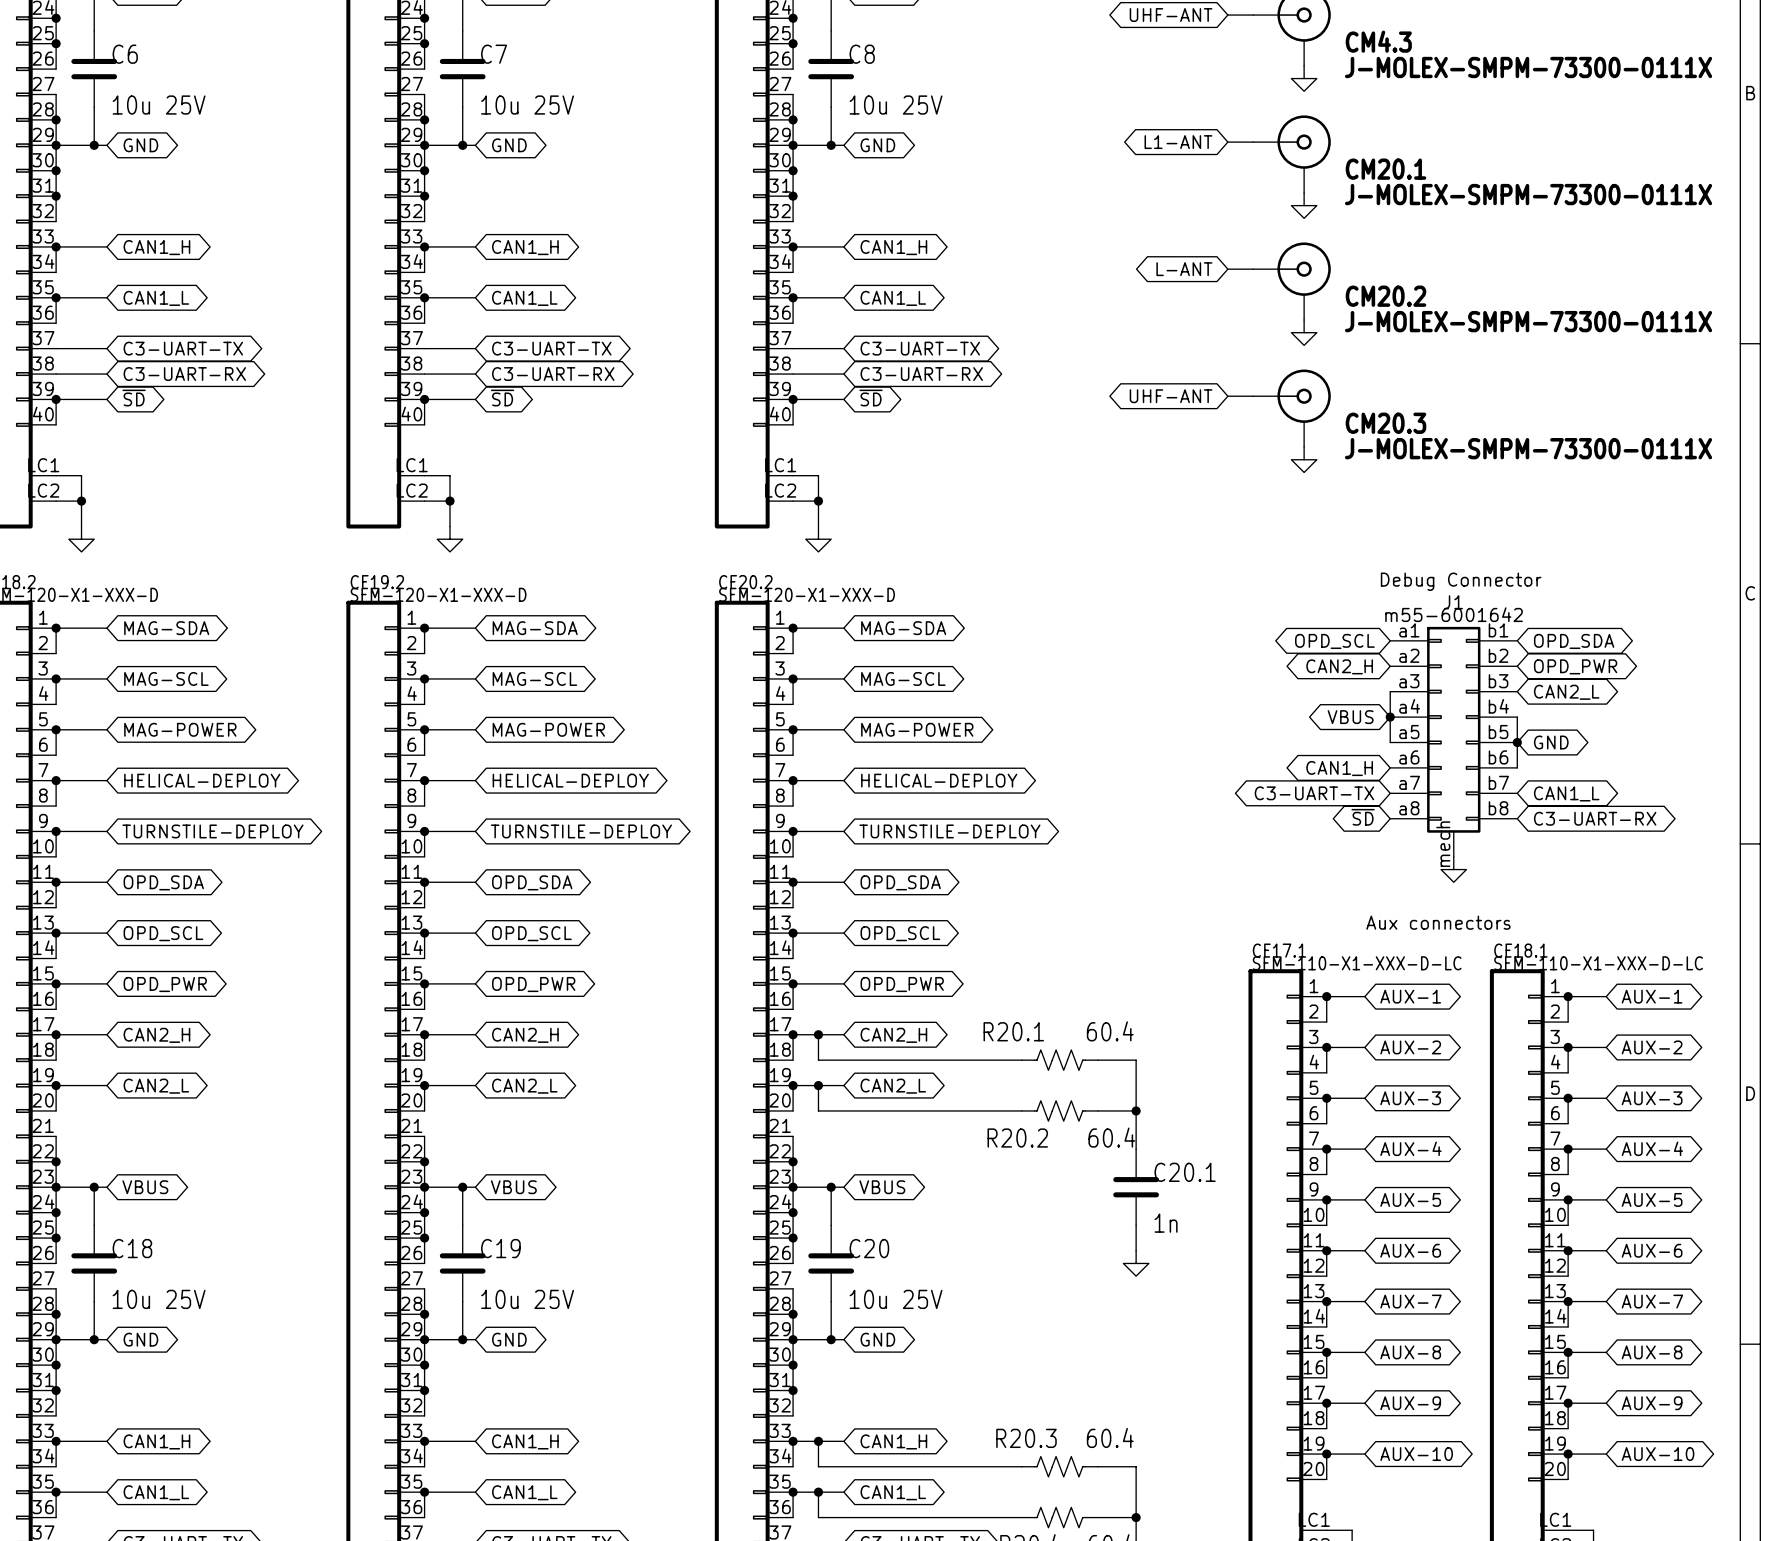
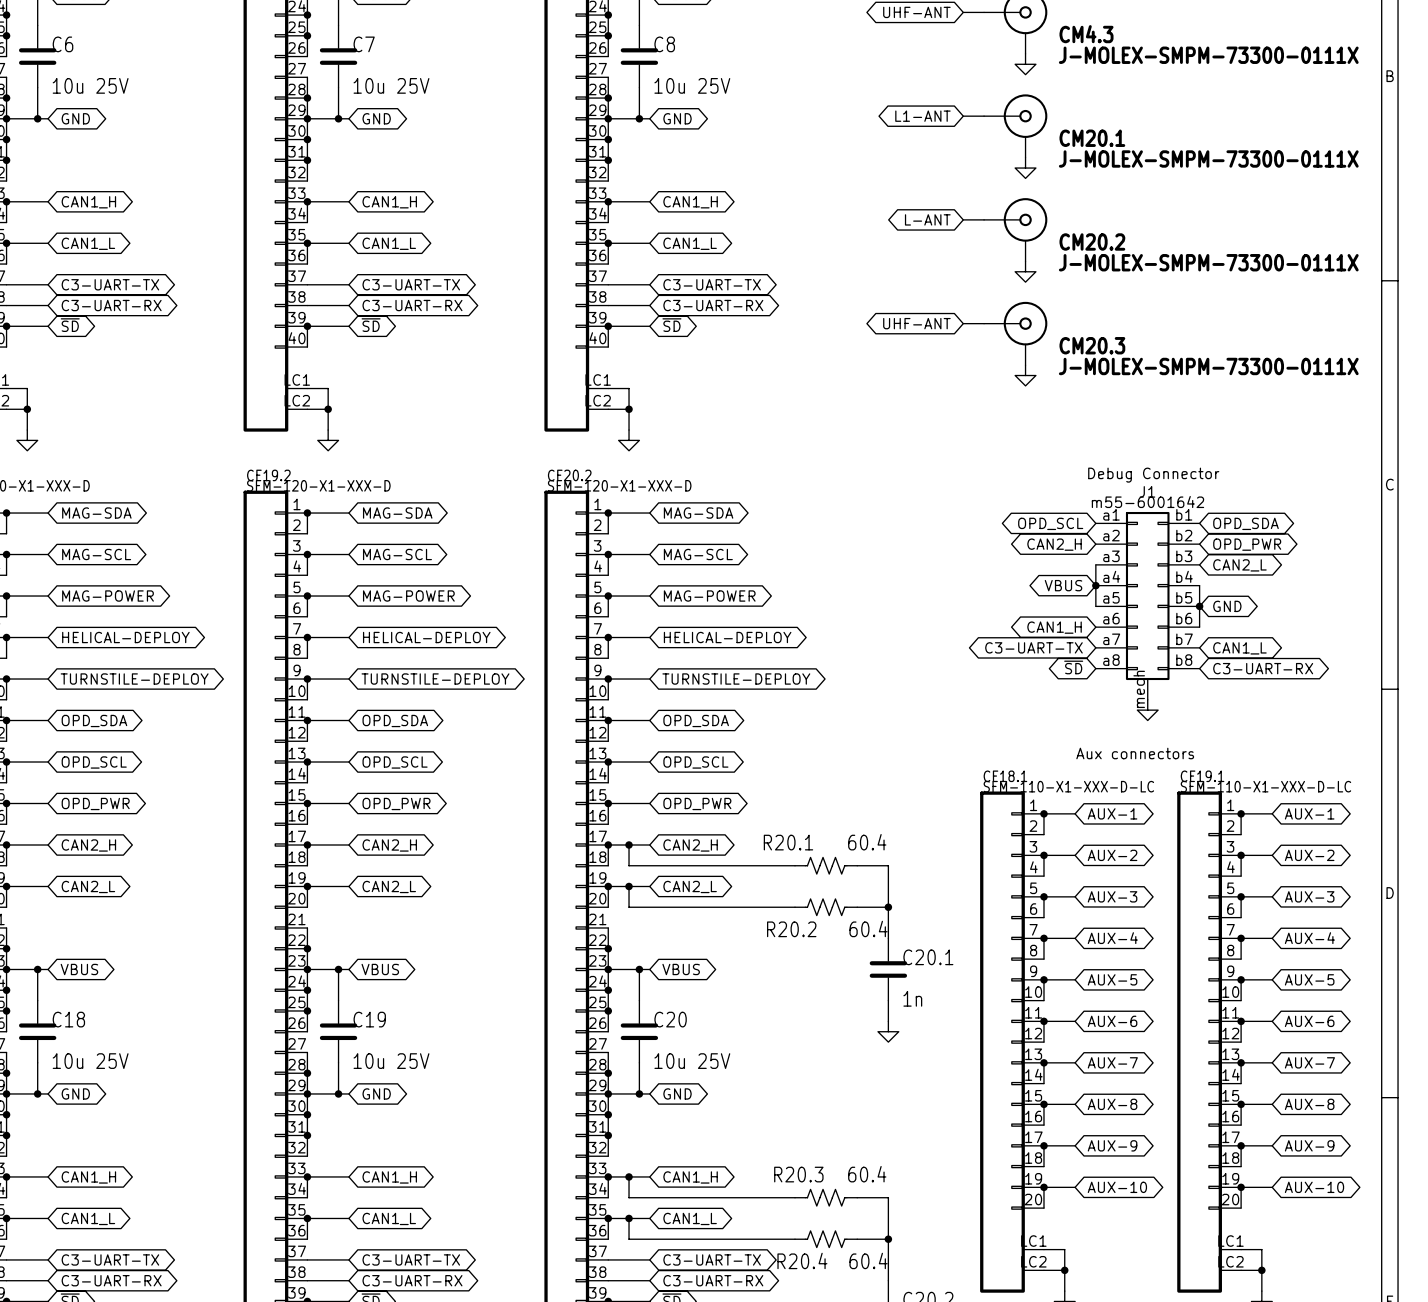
CF17.1 name: CF17.1 (1279, 950) -> CF18.1 (1005, 776)
CF18.1 name: CF18.1 (1520, 950) -> CF19.1 (1202, 776)

